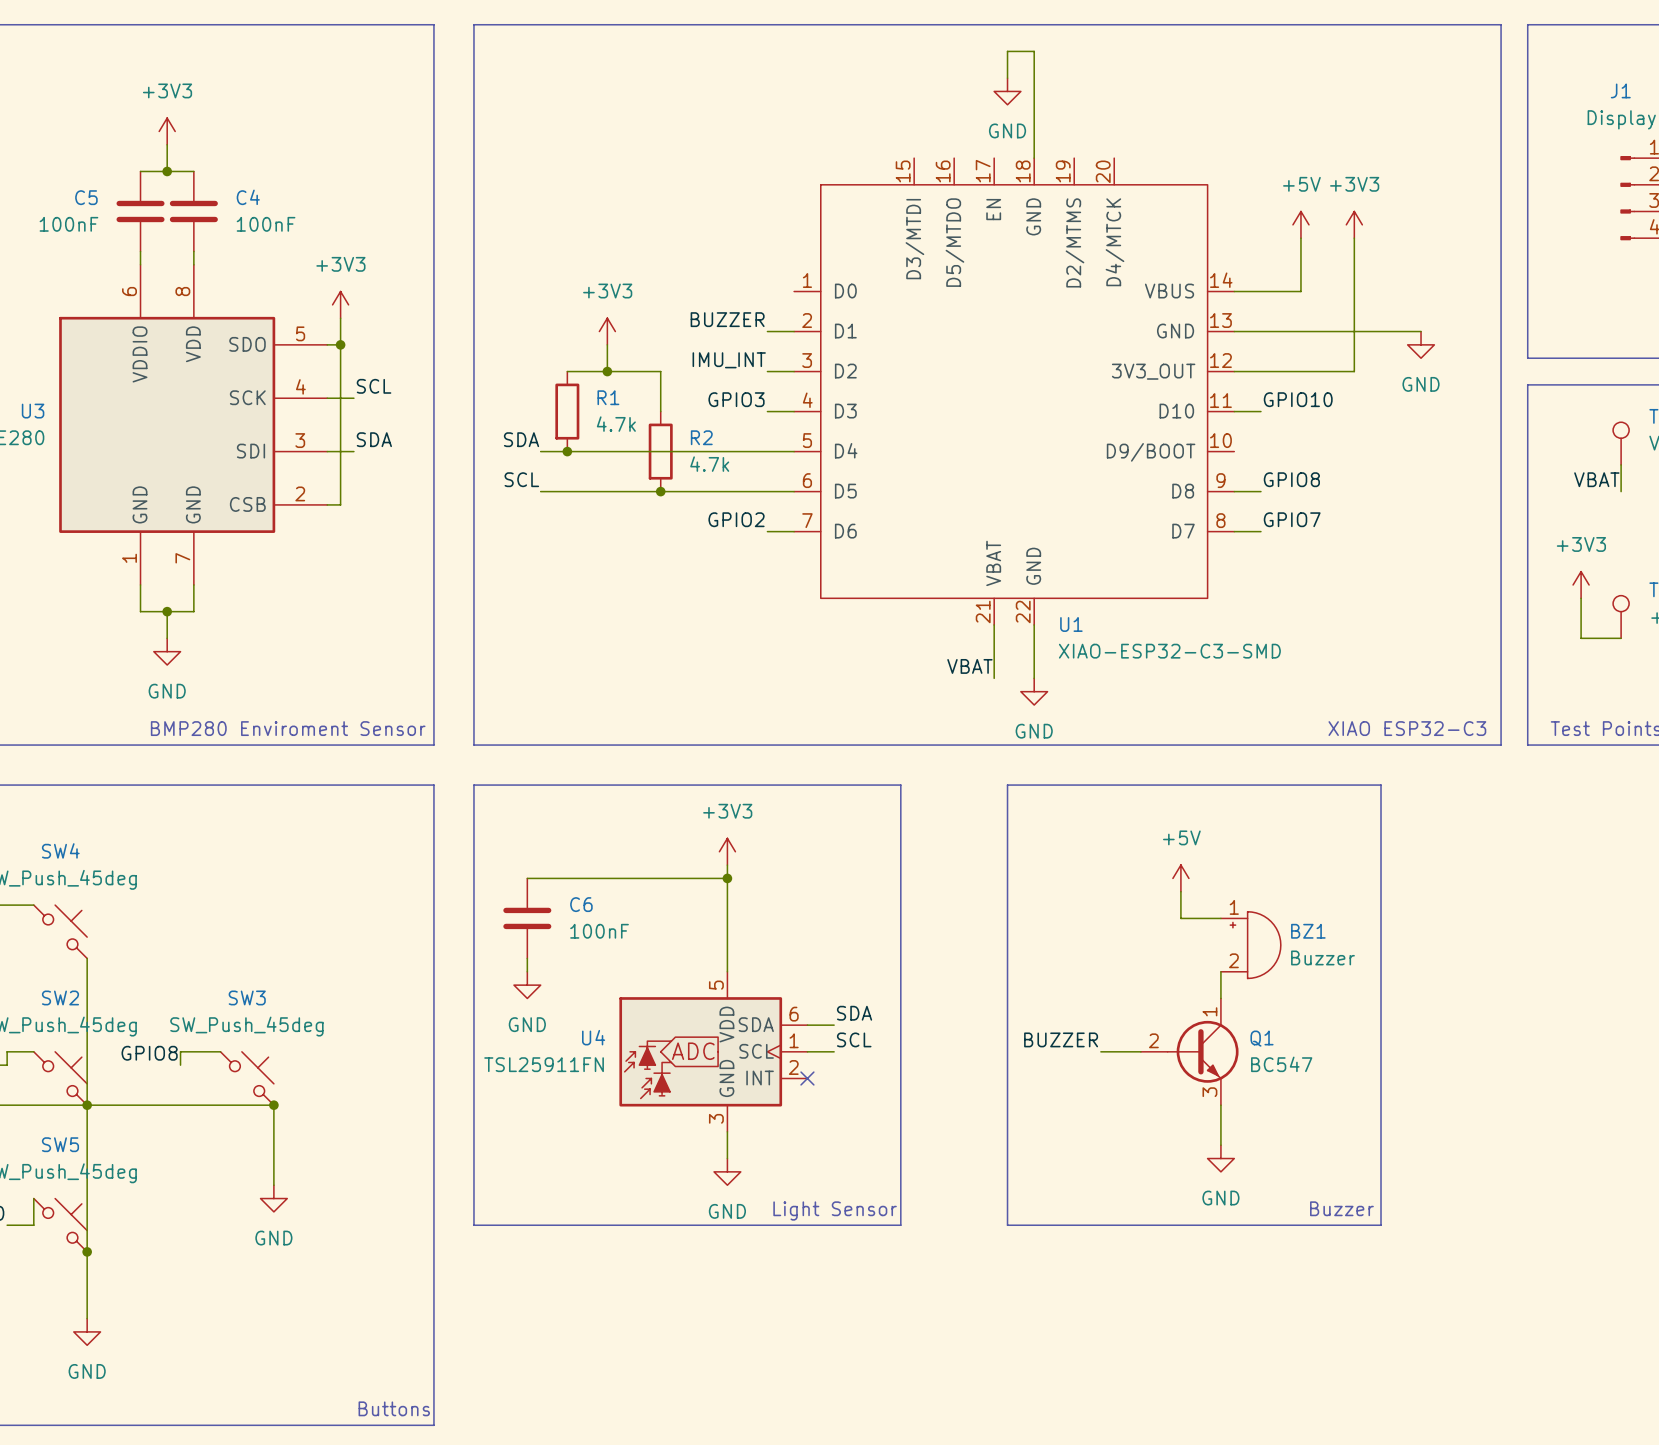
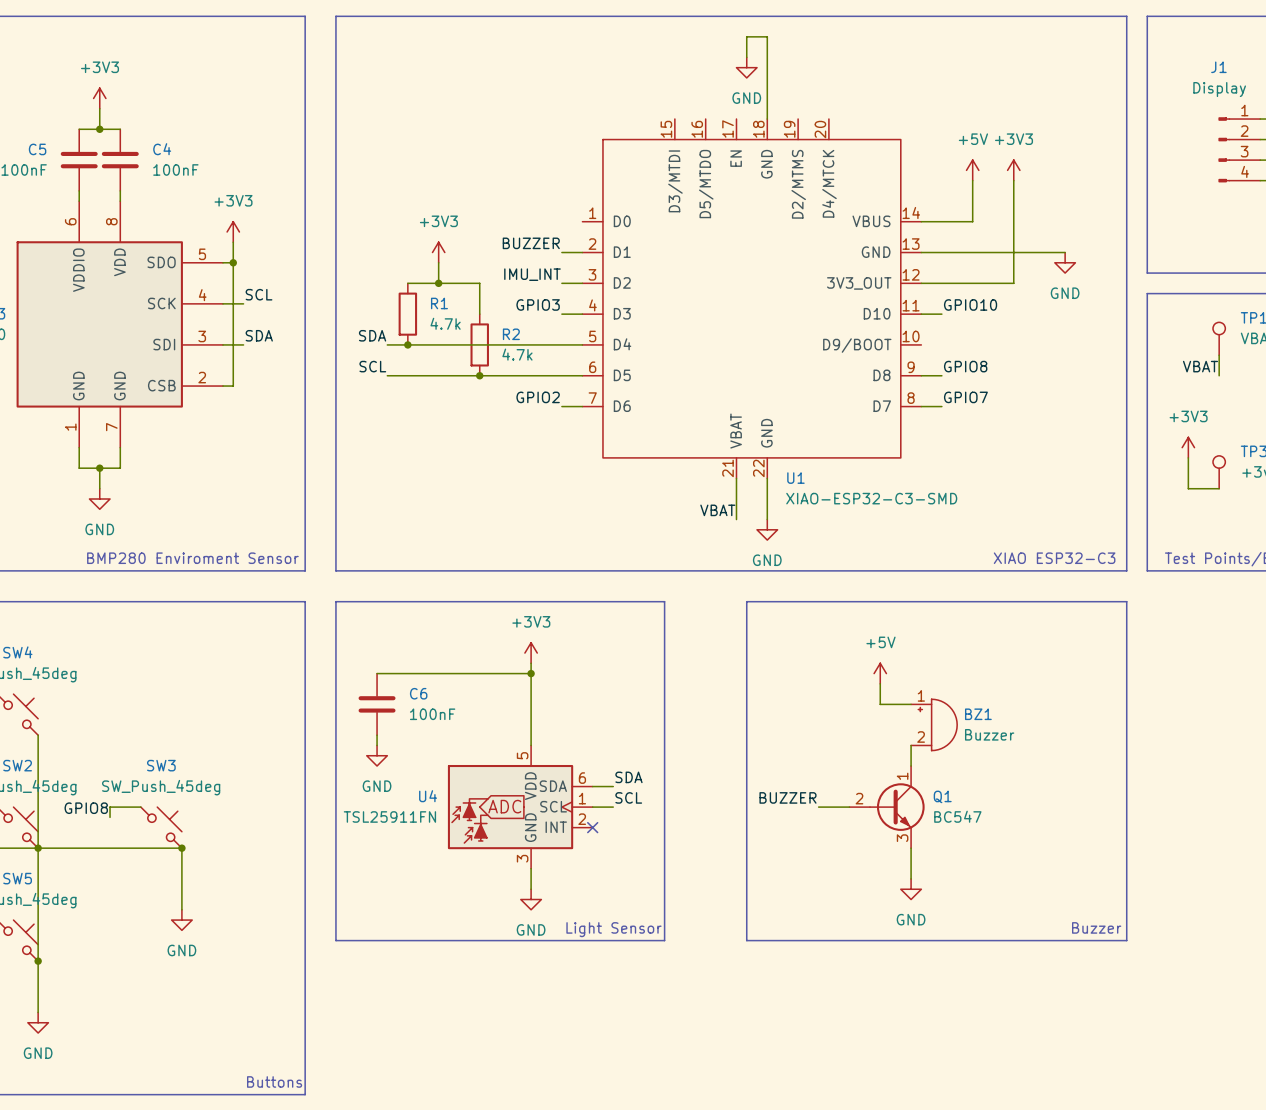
line: (1381, 785) (1381, 1225) -> (1034, 601) (1126, 601) (1126, 940) (1034, 940)
text position: Buzzer (1341, 1208) -> Buzzer (1096, 927)

